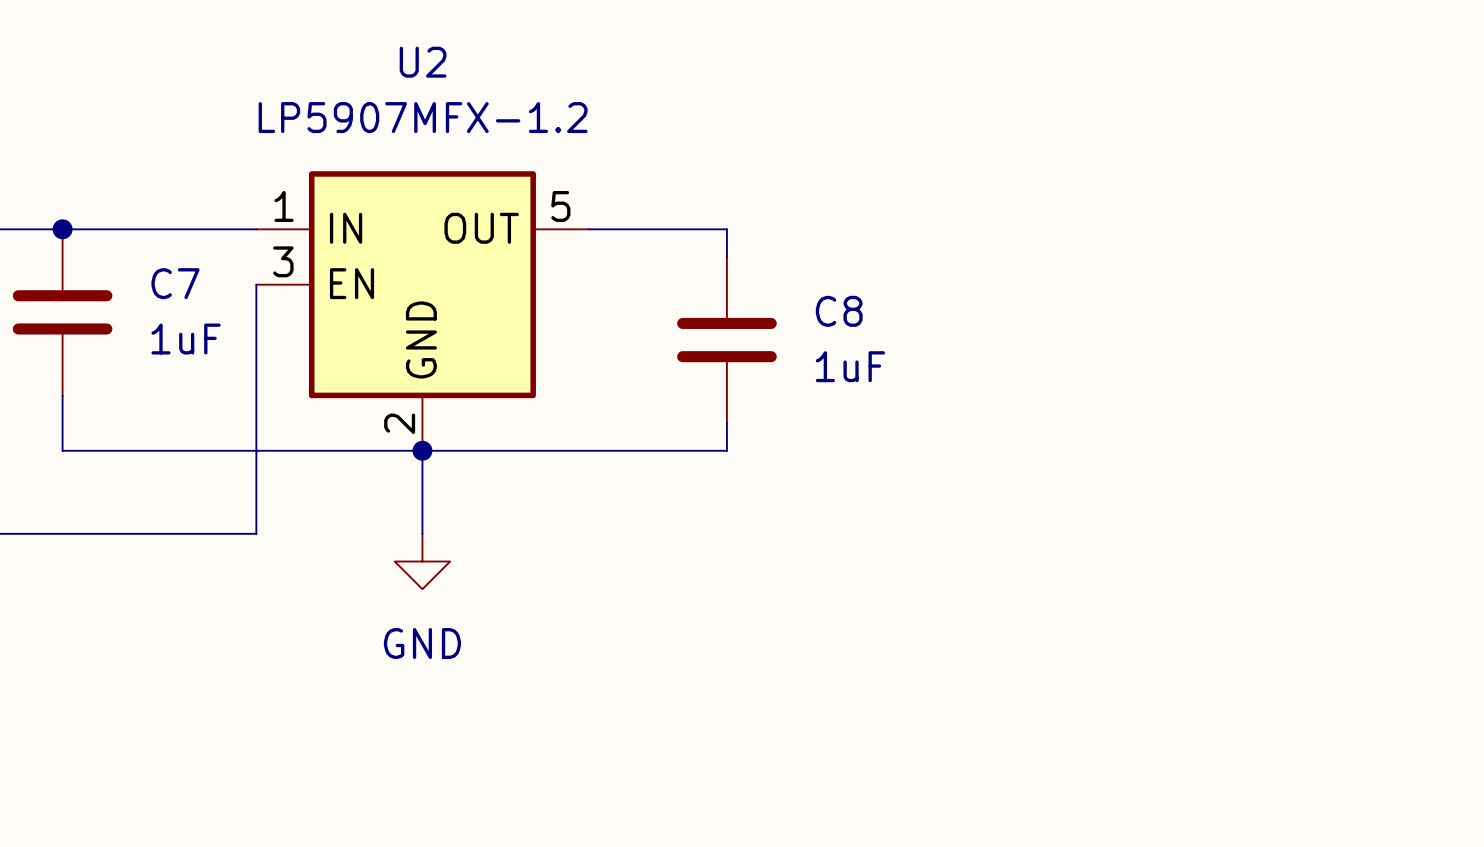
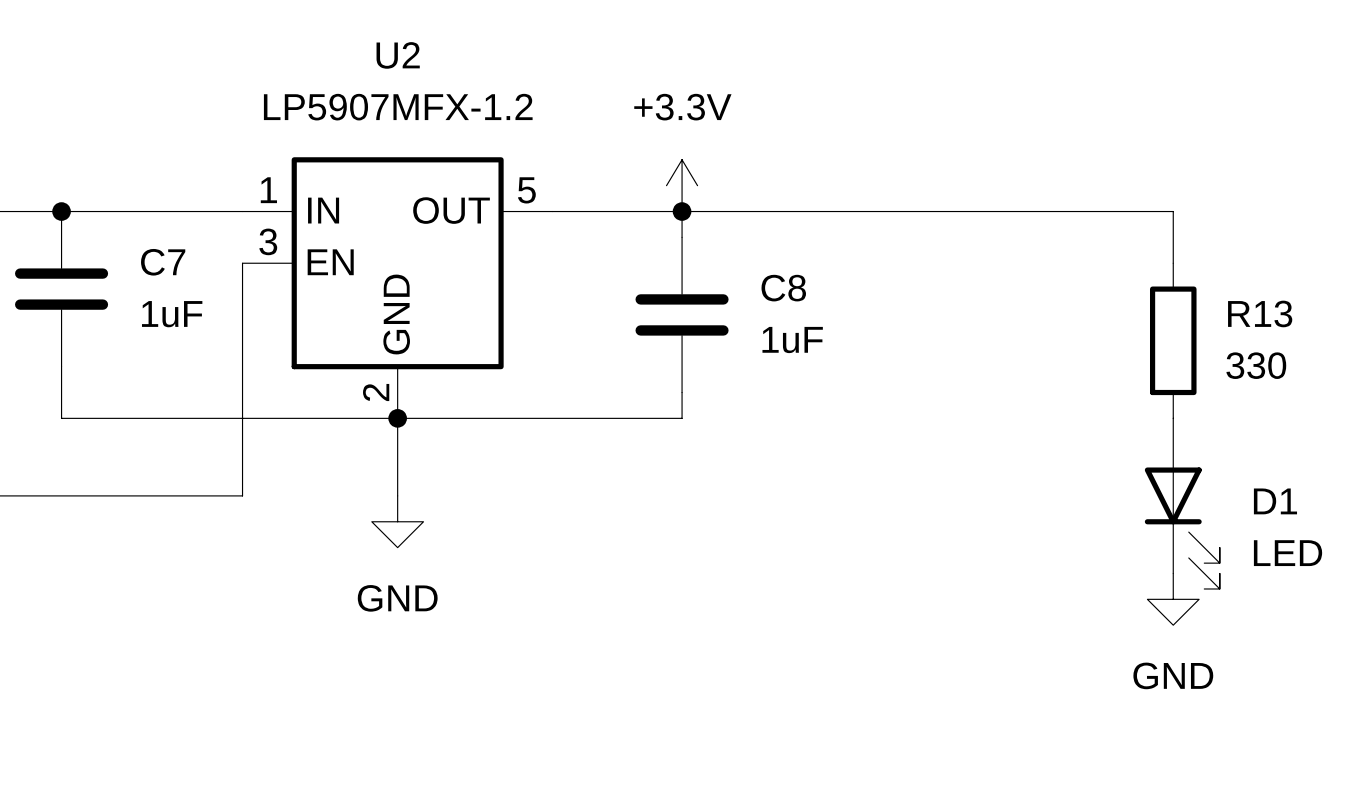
power symbol: none -> +3.3V (682, 185)
wire: none -> (682, 211) (1173, 211) (1173, 263)
junction: none -> (682, 211)
R13: none -> 330 (1173, 340)
D1: none -> LED (1182, 503)
power symbol: none -> GND (1173, 599)

